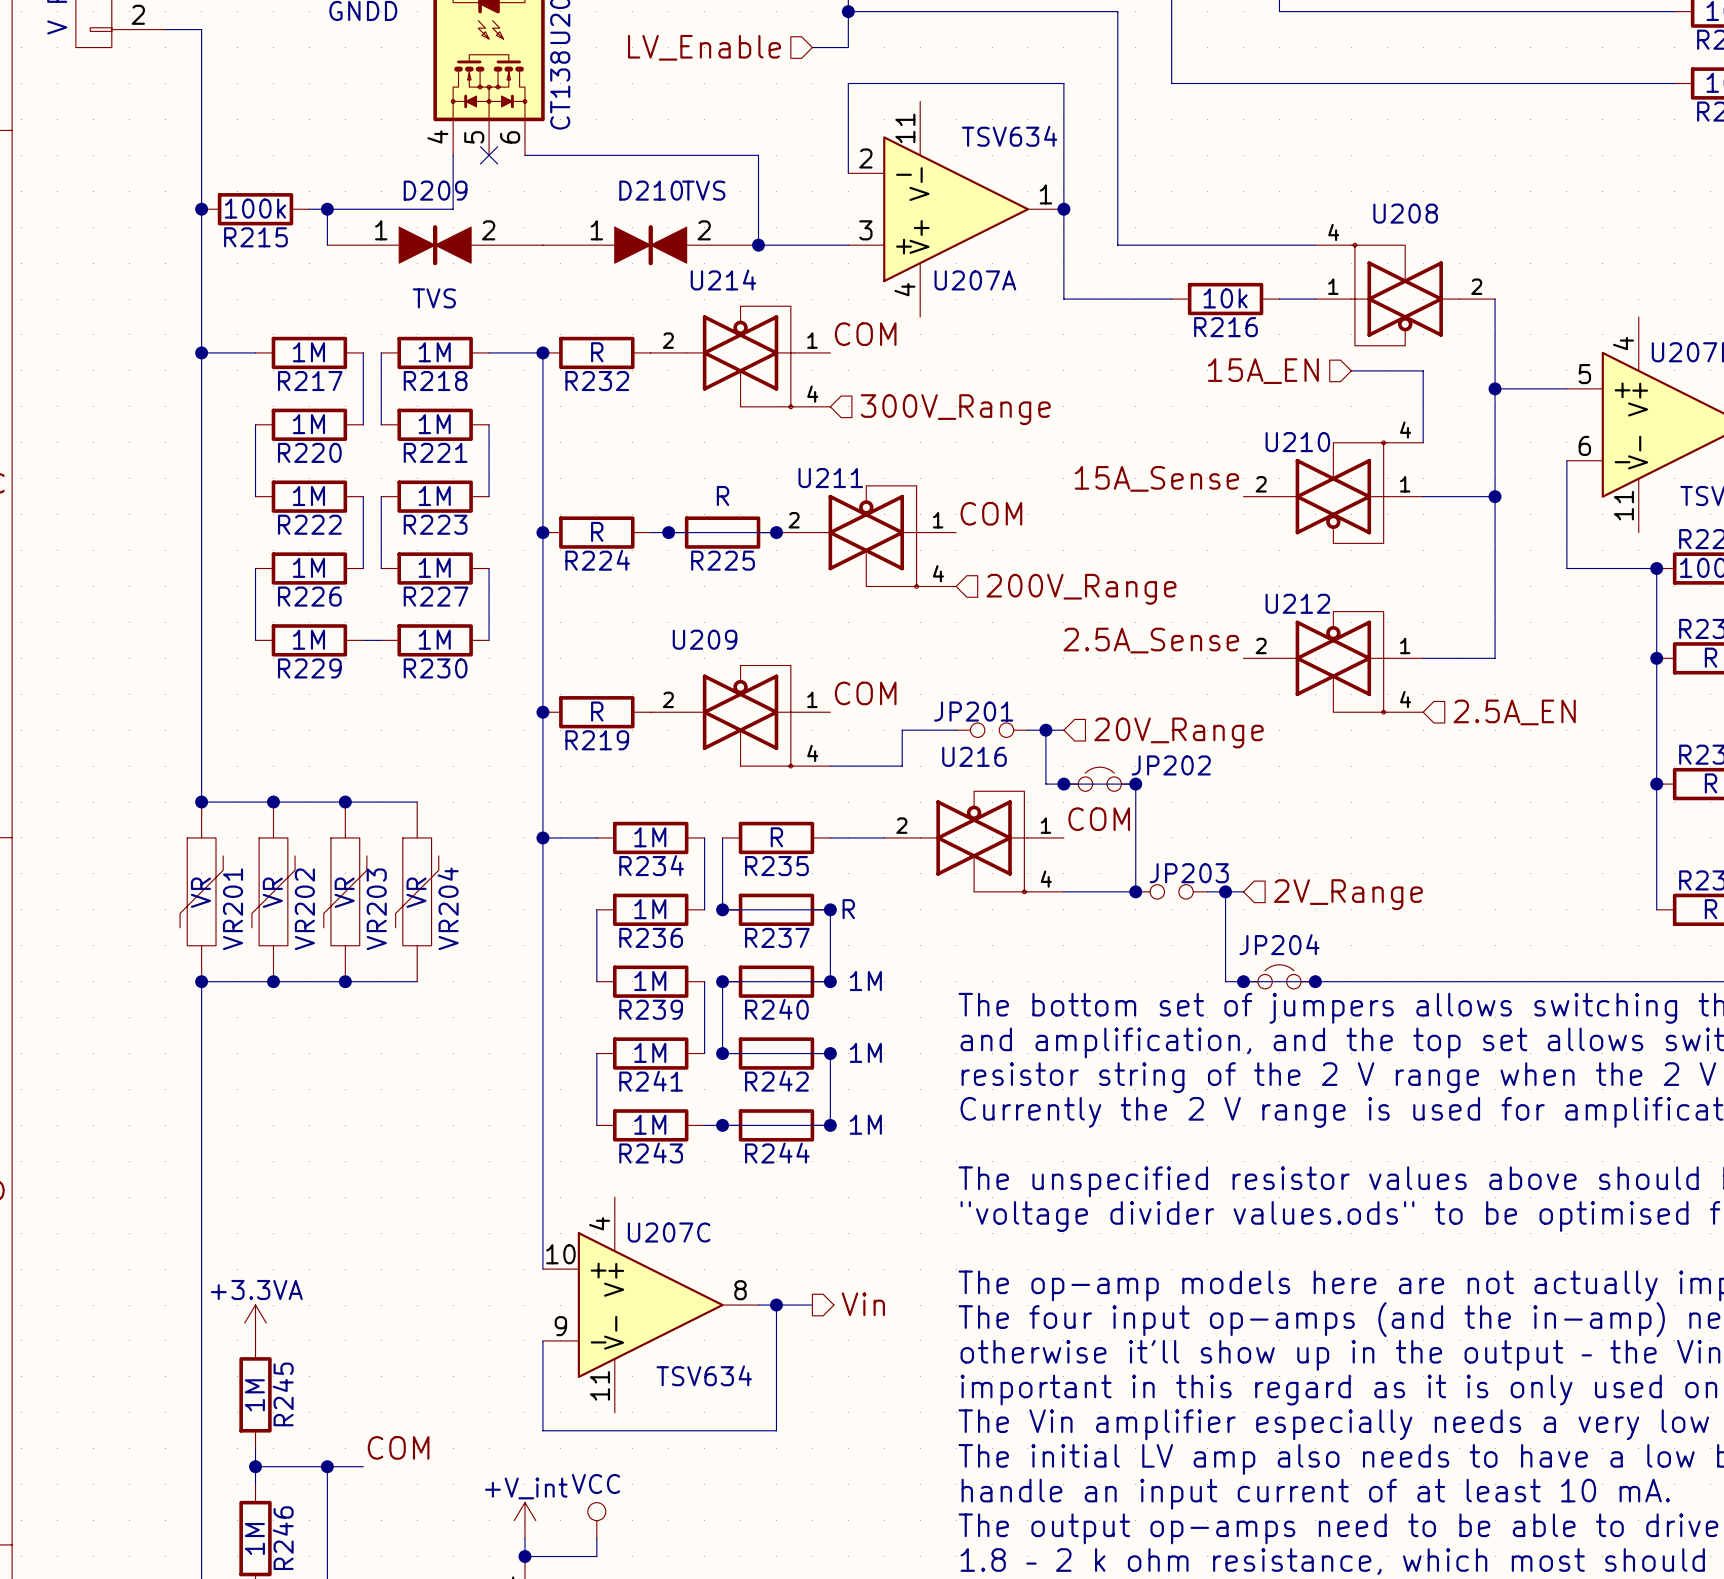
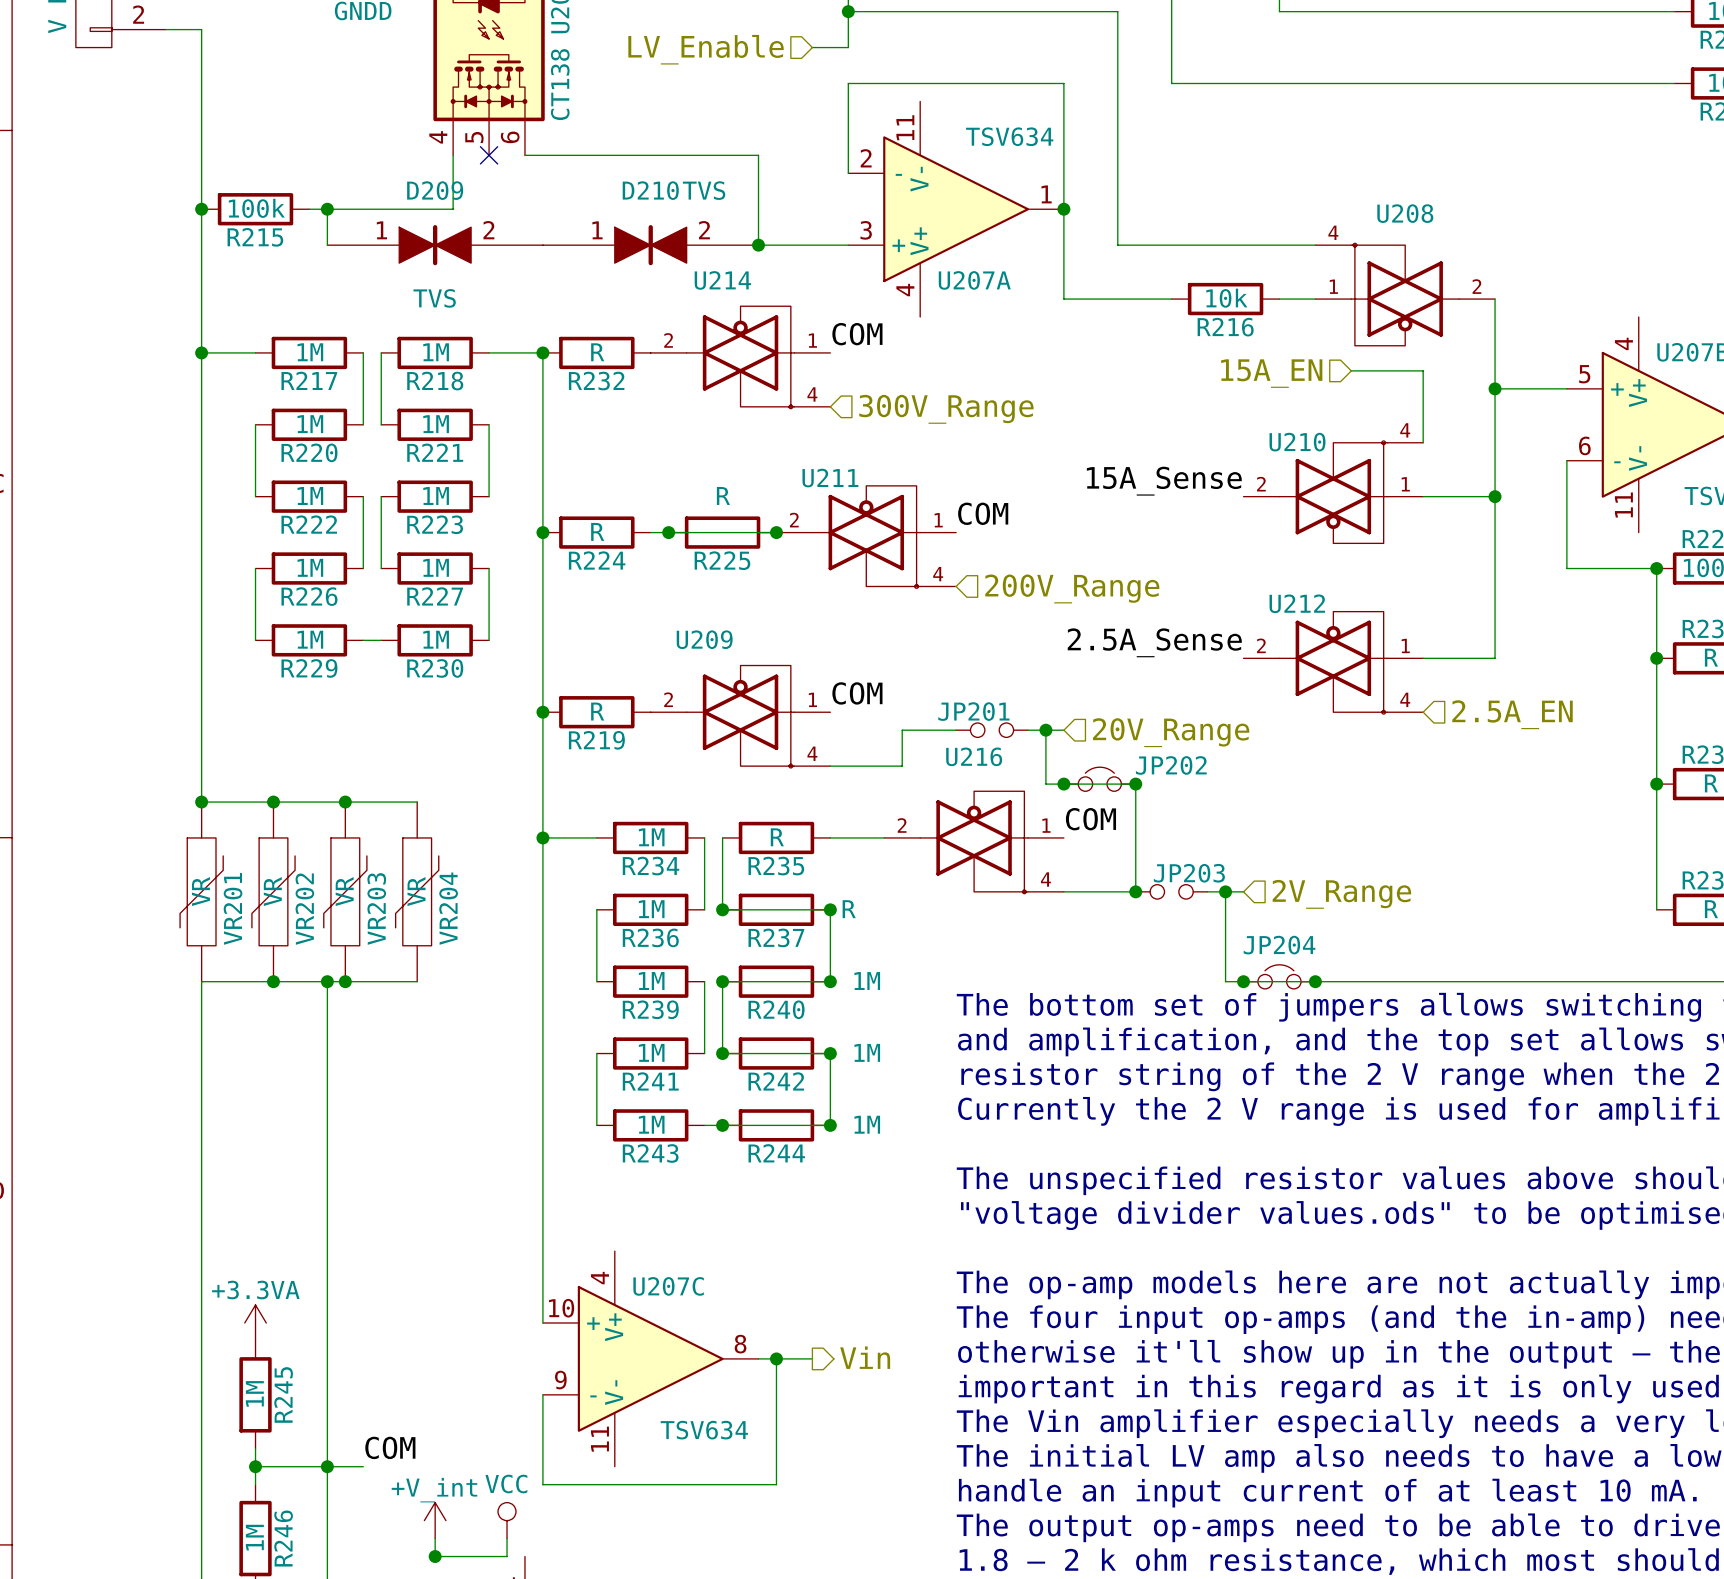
junction: (201, 981) -> none
wire: none -> (327, 981) (327, 1466)
junction: none -> (327, 981)
hierarchical label position: Vin (863, 1304) -> Vin (865, 1357)
U207C position: (650, 1305) -> (650, 1358)
wire: (758, 1305) (812, 1305) -> (758, 1358) (812, 1358)
wire: (776, 1305) (776, 1358) -> none
junction position: (776, 1305) -> (776, 1358)
wire: (542, 1340) (542, 1394) -> (542, 1269) (542, 1323)
wire: (542, 1430) (776, 1430) -> (542, 1430) (542, 1484) (776, 1484) (776, 1430)
power symbol position: +V_int (524, 1520) -> +V_int (435, 1520)
power symbol position: VCC (596, 1520) -> VCC (507, 1520)
wire: (524, 1538) (524, 1556) (596, 1556) (596, 1538) -> (435, 1538) (435, 1556) (507, 1556) (507, 1538)
junction: none -> (435, 1556)
junction: (524, 1556) -> none

